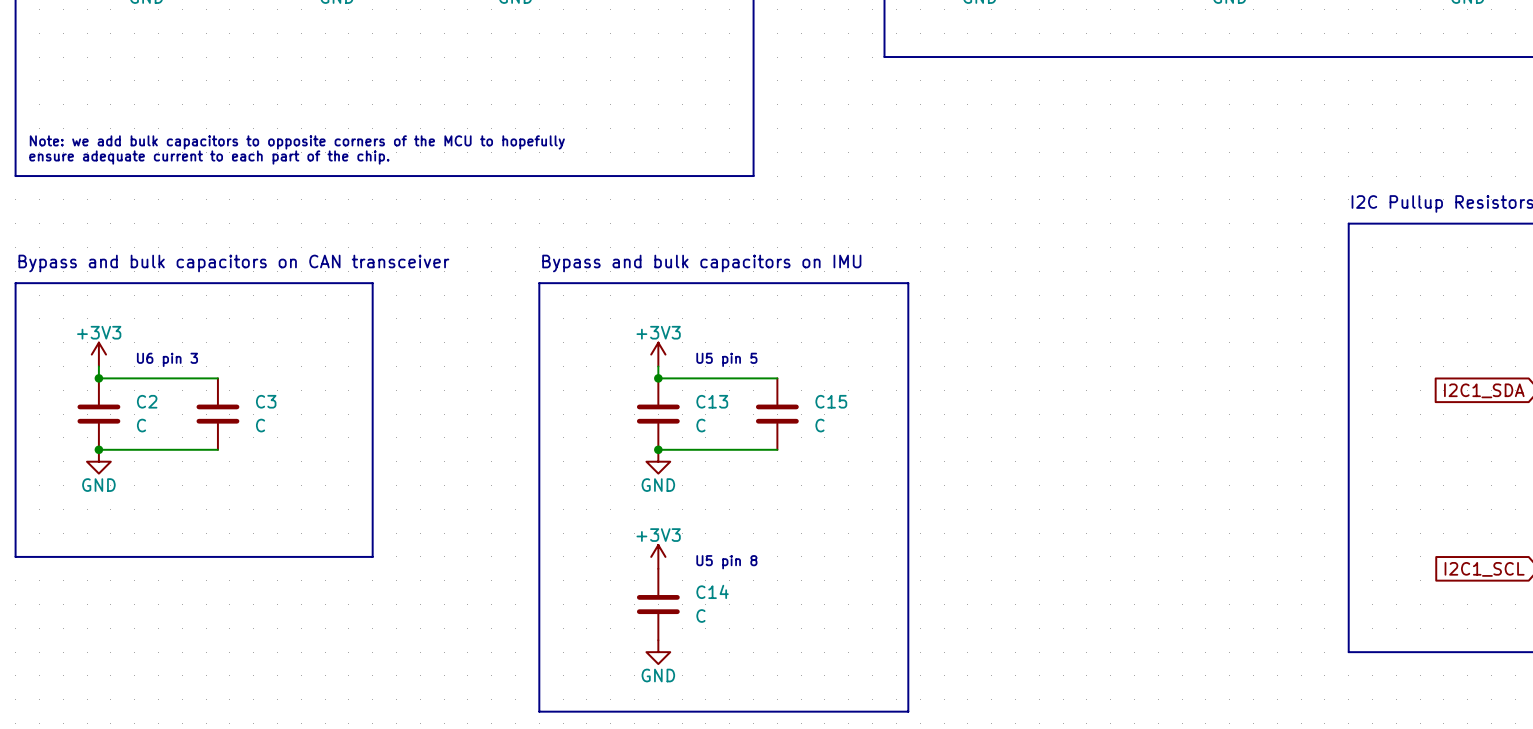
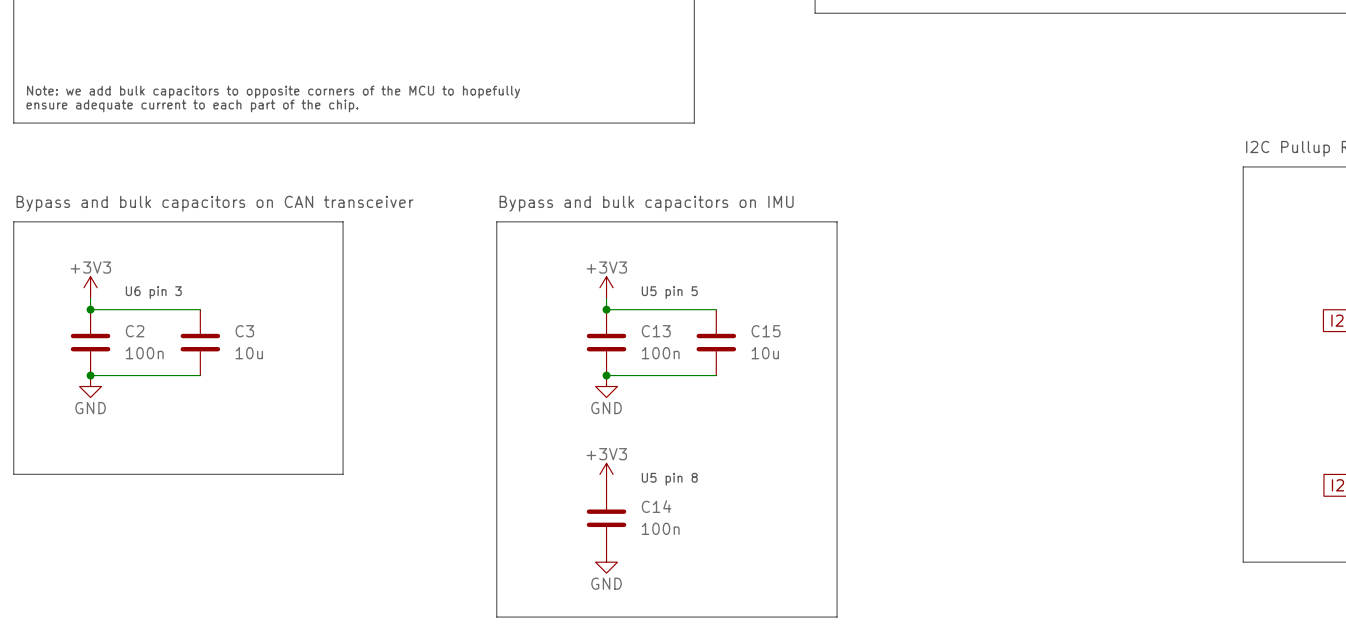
C2 value: C (141, 425) -> 100n (144, 353)
C3 value: C (260, 425) -> 10u (249, 353)
C13 value: C (700, 425) -> 100n (660, 353)
C15 value: C (819, 425) -> 10u (765, 353)
C14 value: C (700, 616) -> 100n (660, 528)

